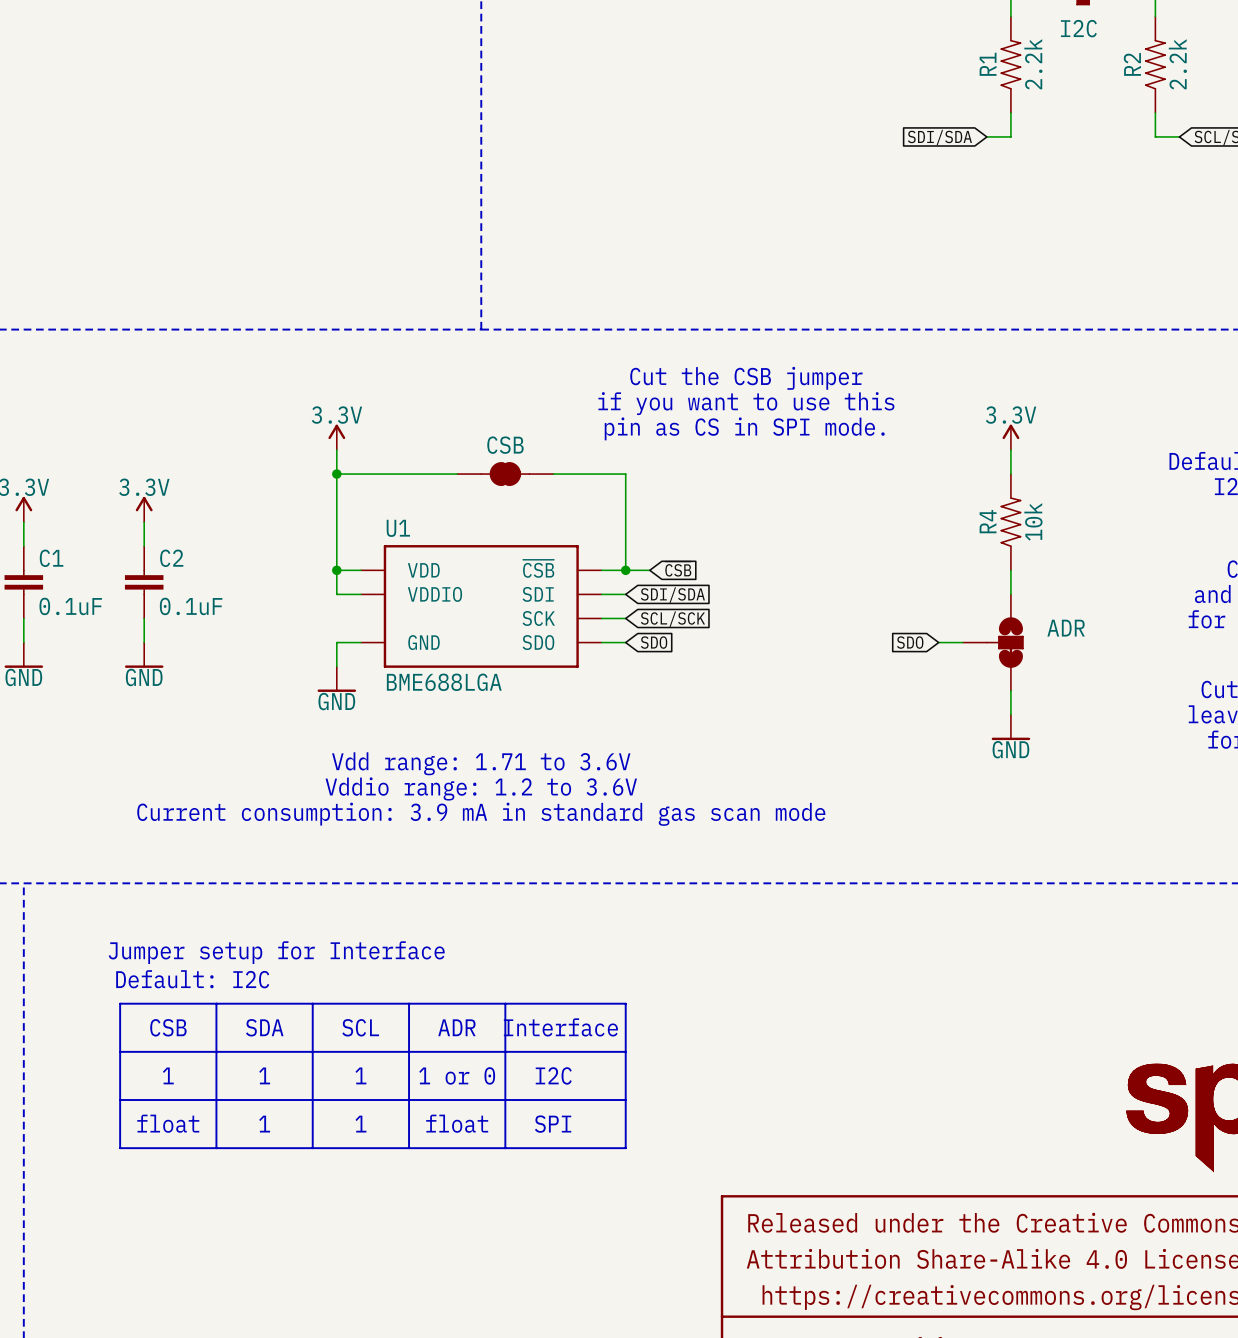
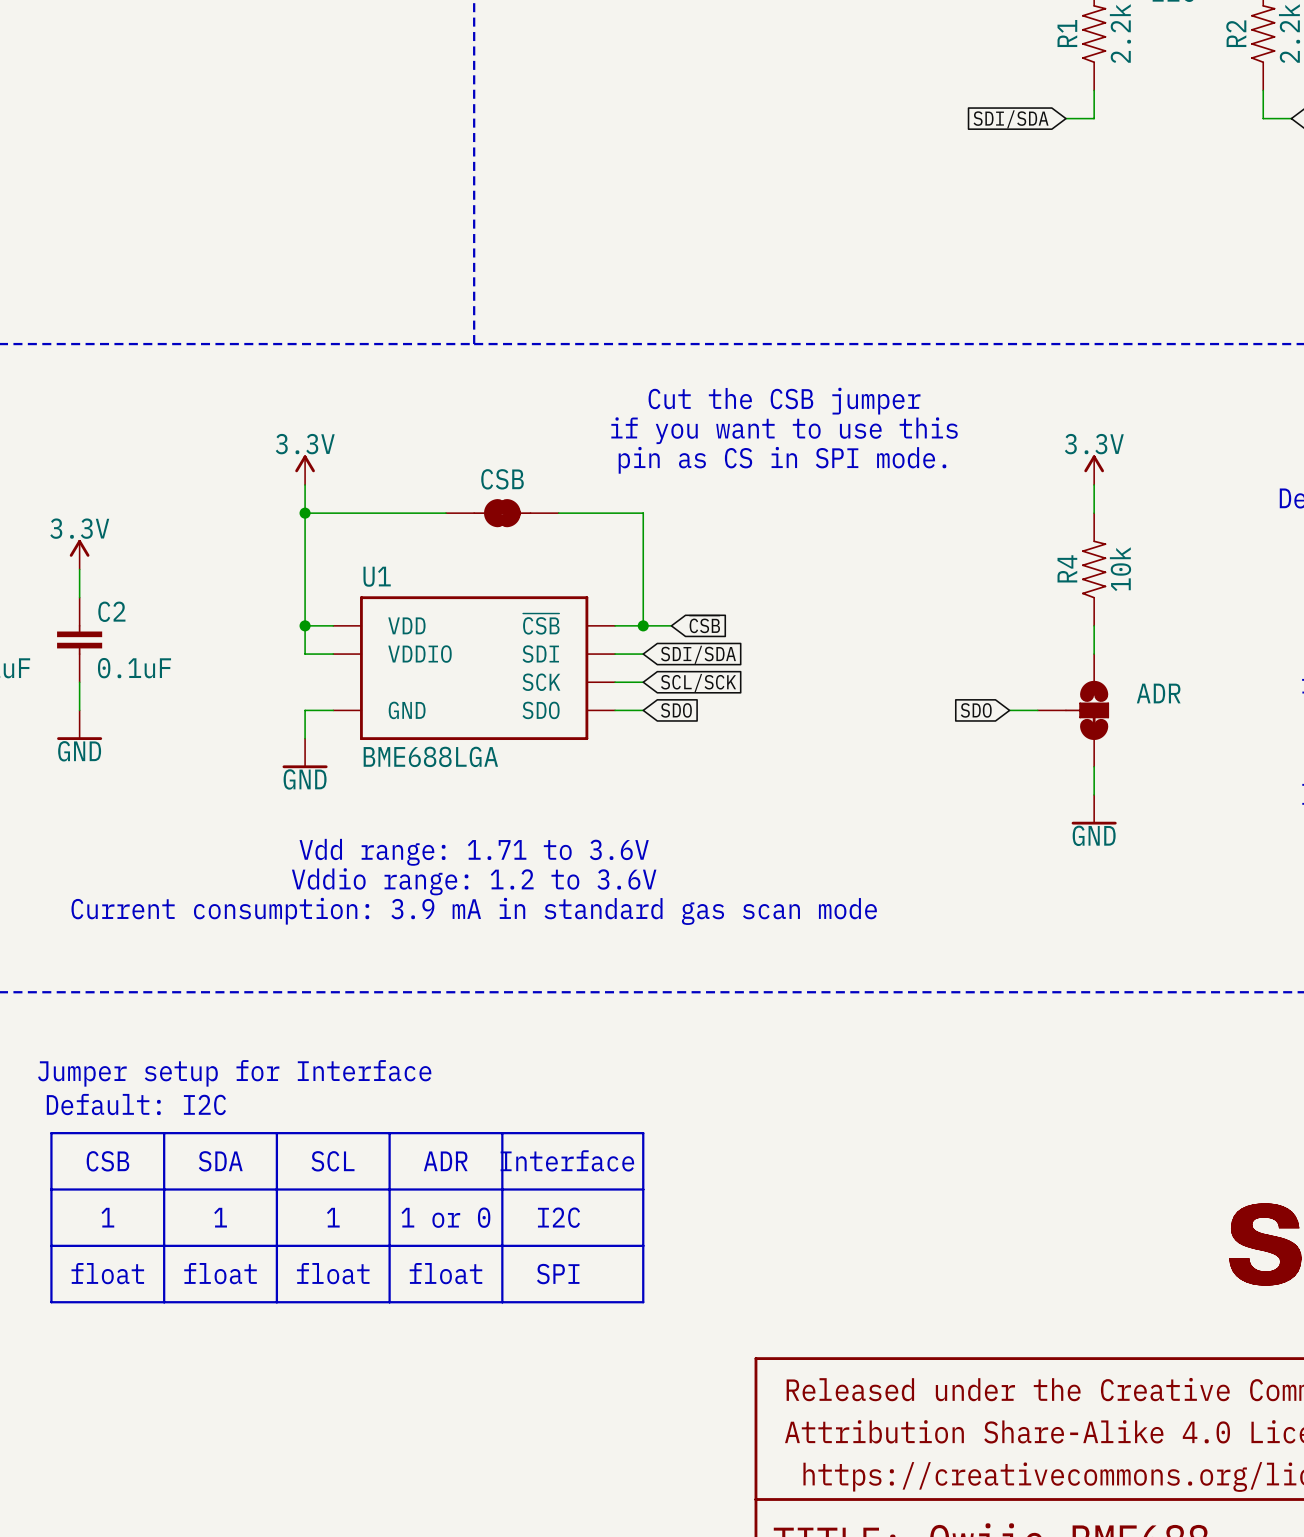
text: 1 (264, 1124) -> float (220, 1273)
text: 1 (360, 1124) -> float (333, 1273)

